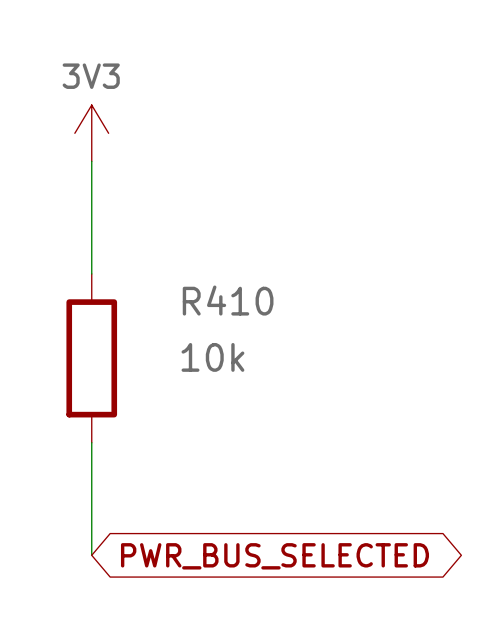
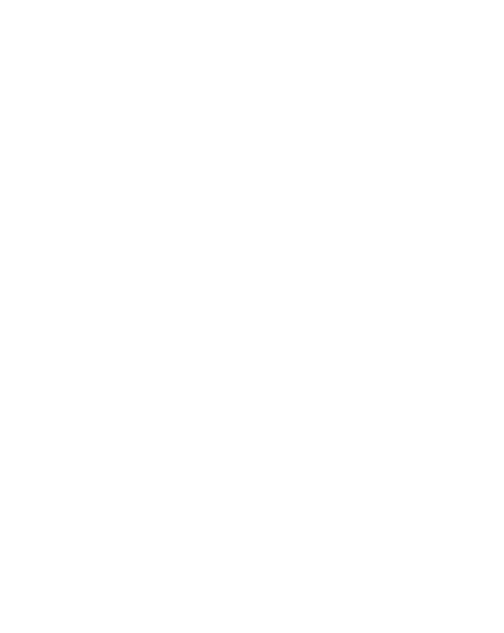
power symbol: 3V3 (91, 133) -> none
wire: (91, 161) (91, 273) -> none
R410: 10k (91, 358) -> none
wire: (91, 442) (91, 555) -> none
global label: PWR_BUS_SELECTED (274, 556) -> none

